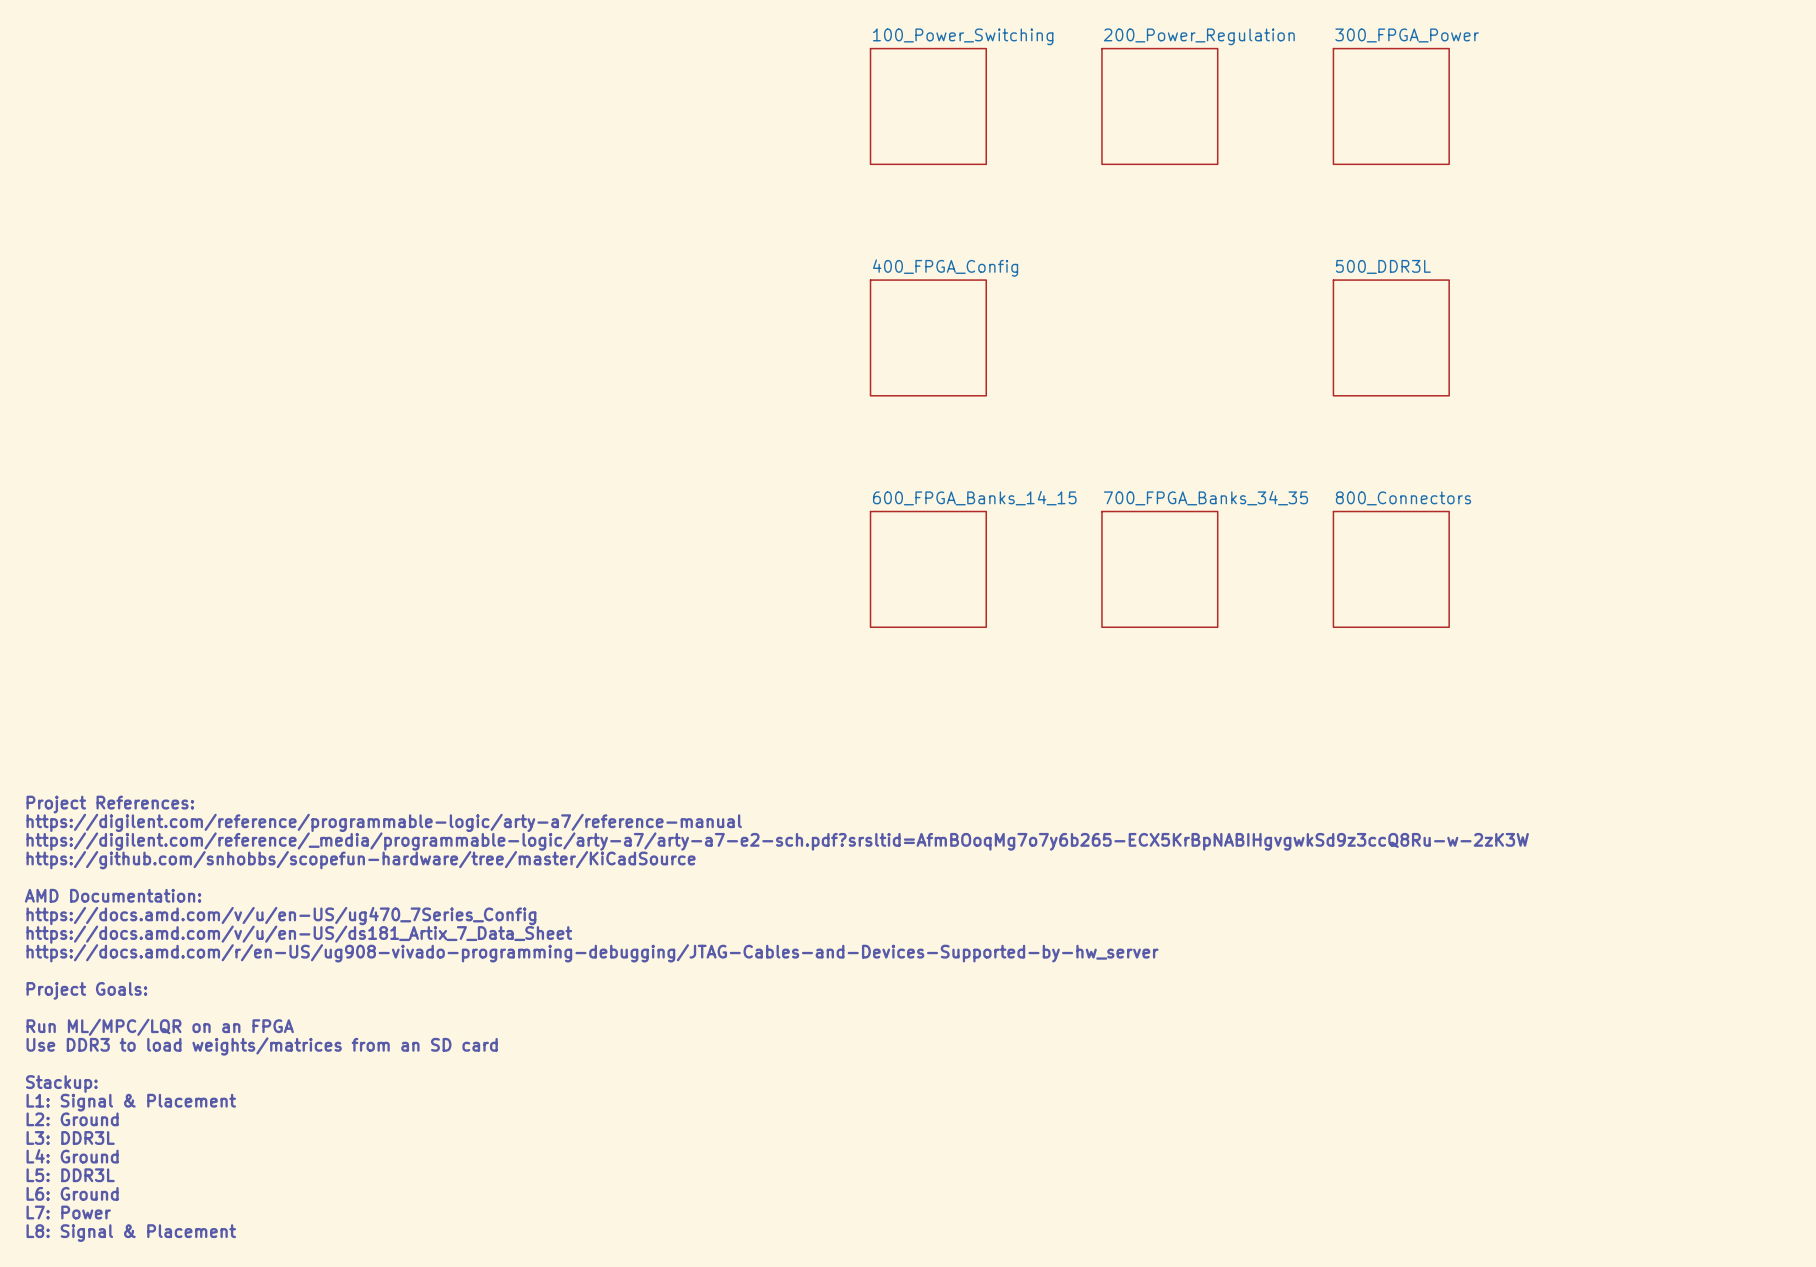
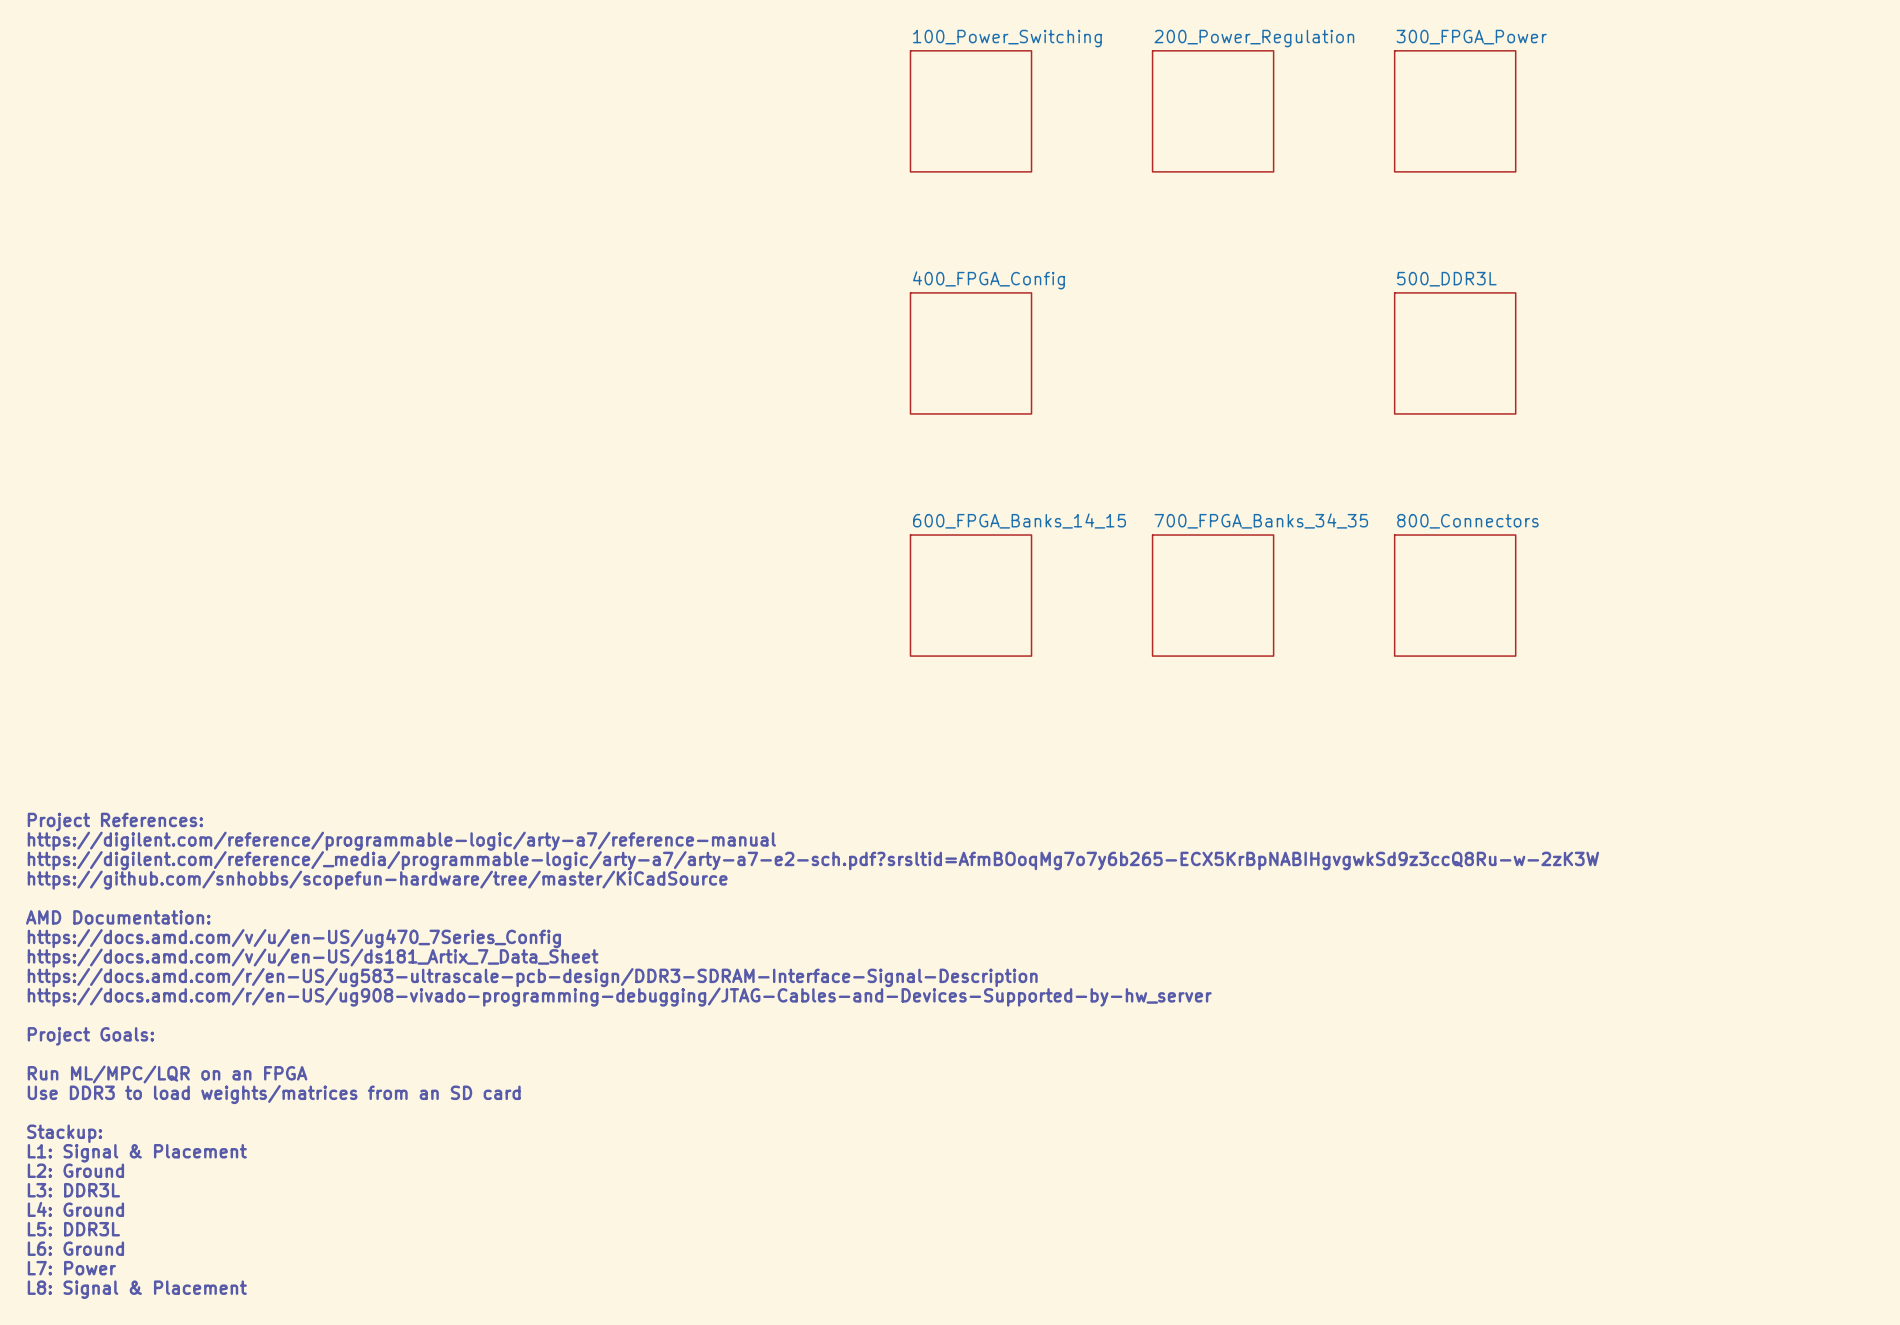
text: none -> Project References: (115, 821)
text: Project References: (110, 804) -> https://digilent.com/reference/programmable-logic/arty-a7/reference-manual (401, 841)
text: https://digilent.com/reference/programmable-logic/arty-a7/reference-manual (384, 822) -> https://digilent.com/reference/_media/programmable-logic/arty-a7/arty-a7-e2-sch.pdf?srsltid=AfmBOoqMg7o7y6b265-ECX5KrBpNABIHgvgwkSd9z3ccQ8Ru-w-2zK3W (813, 860)
text: https://digilent.com/reference/_media/programmable-logic/arty-a7/arty-a7-e2-sch.pdf?srsltid=AfmBOoqMg7o7y6b265-ECX5KrBpNABIHgvgwkSd9z3ccQ8Ru-w-2zK3W (777, 841) -> https://github.com/snhobbs/scopefun-hardware/tree/master/KiCadSource (377, 880)
text: https://github.com/snhobbs/scopefun-hardware/tree/master/KiCadSource (361, 860) -> none
text: none -> AMD Documentation: (118, 917)
text: AMD Documentation: (113, 895) -> https://docs.amd.com/v/u/en-US/ug470_7Series_Config (294, 938)
text: https://docs.amd.com/v/u/en-US/ug470_7Series_Config (281, 916) -> https://docs.amd.com/v/u/en-US/ds181_Artix_7_Data_Sheet (313, 958)
text: https://docs.amd.com/v/u/en-US/ds181_Artix_7_Data_Sheet (299, 934) -> https://docs.amd.com/r/en-US/ug583-ultrascale-pcb-design/DDR3-SDRAM-Interface-Signal-Description (532, 977)

